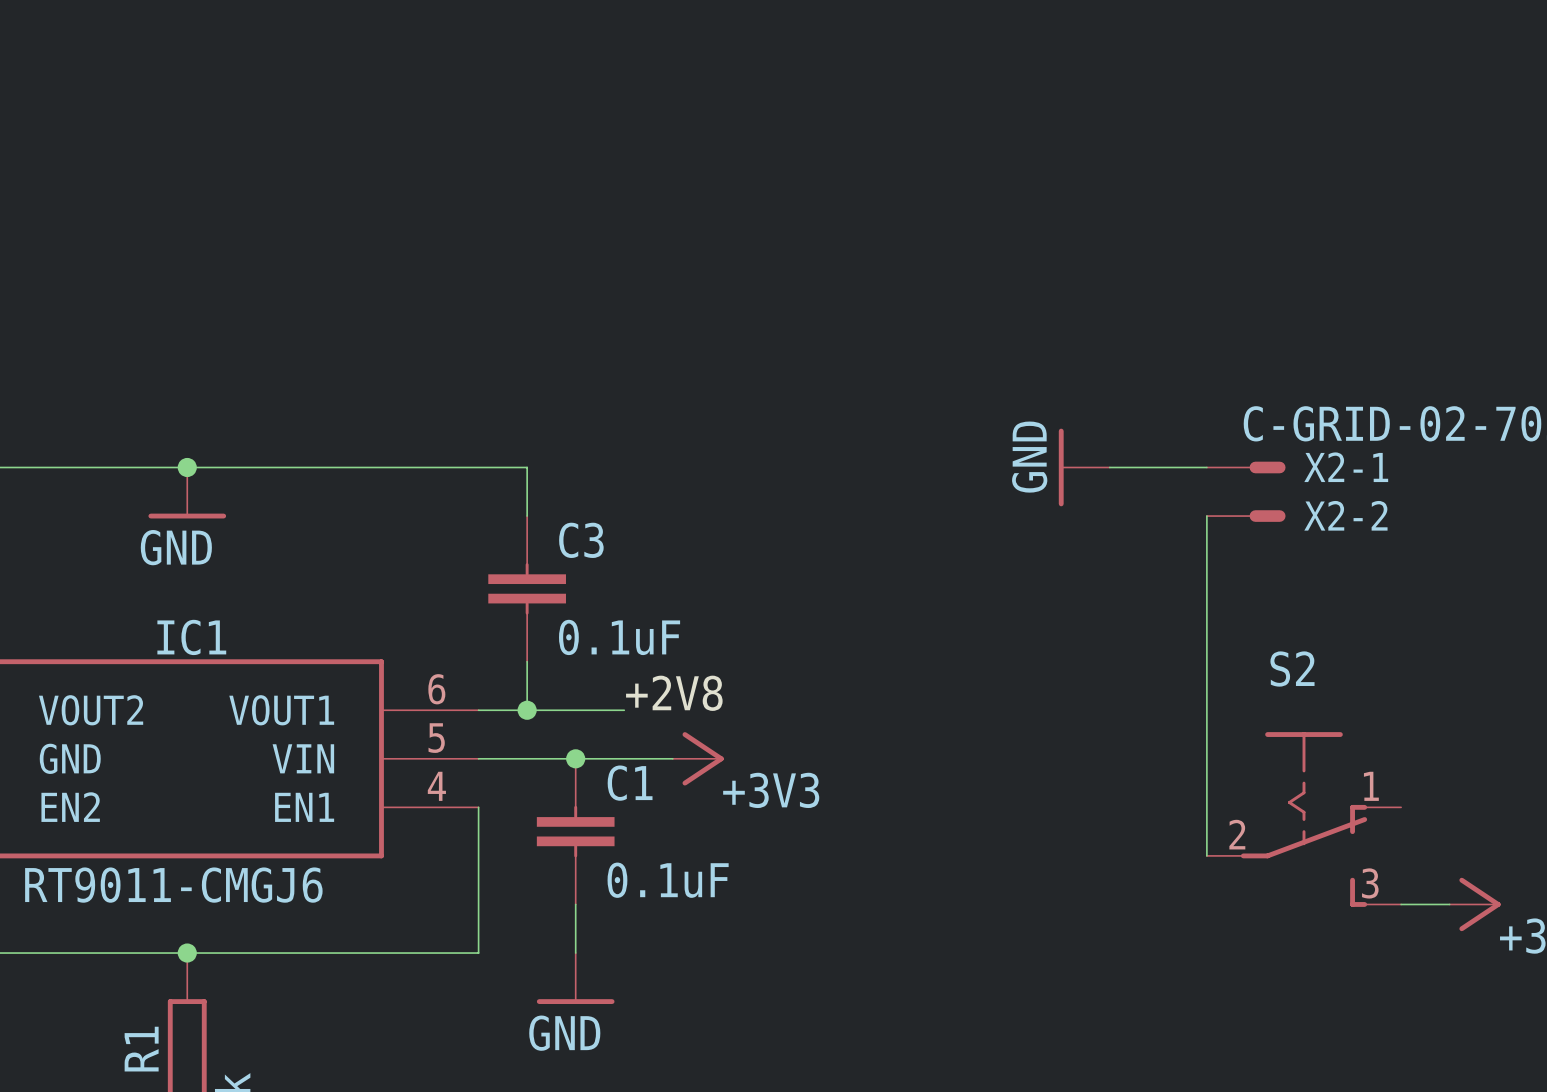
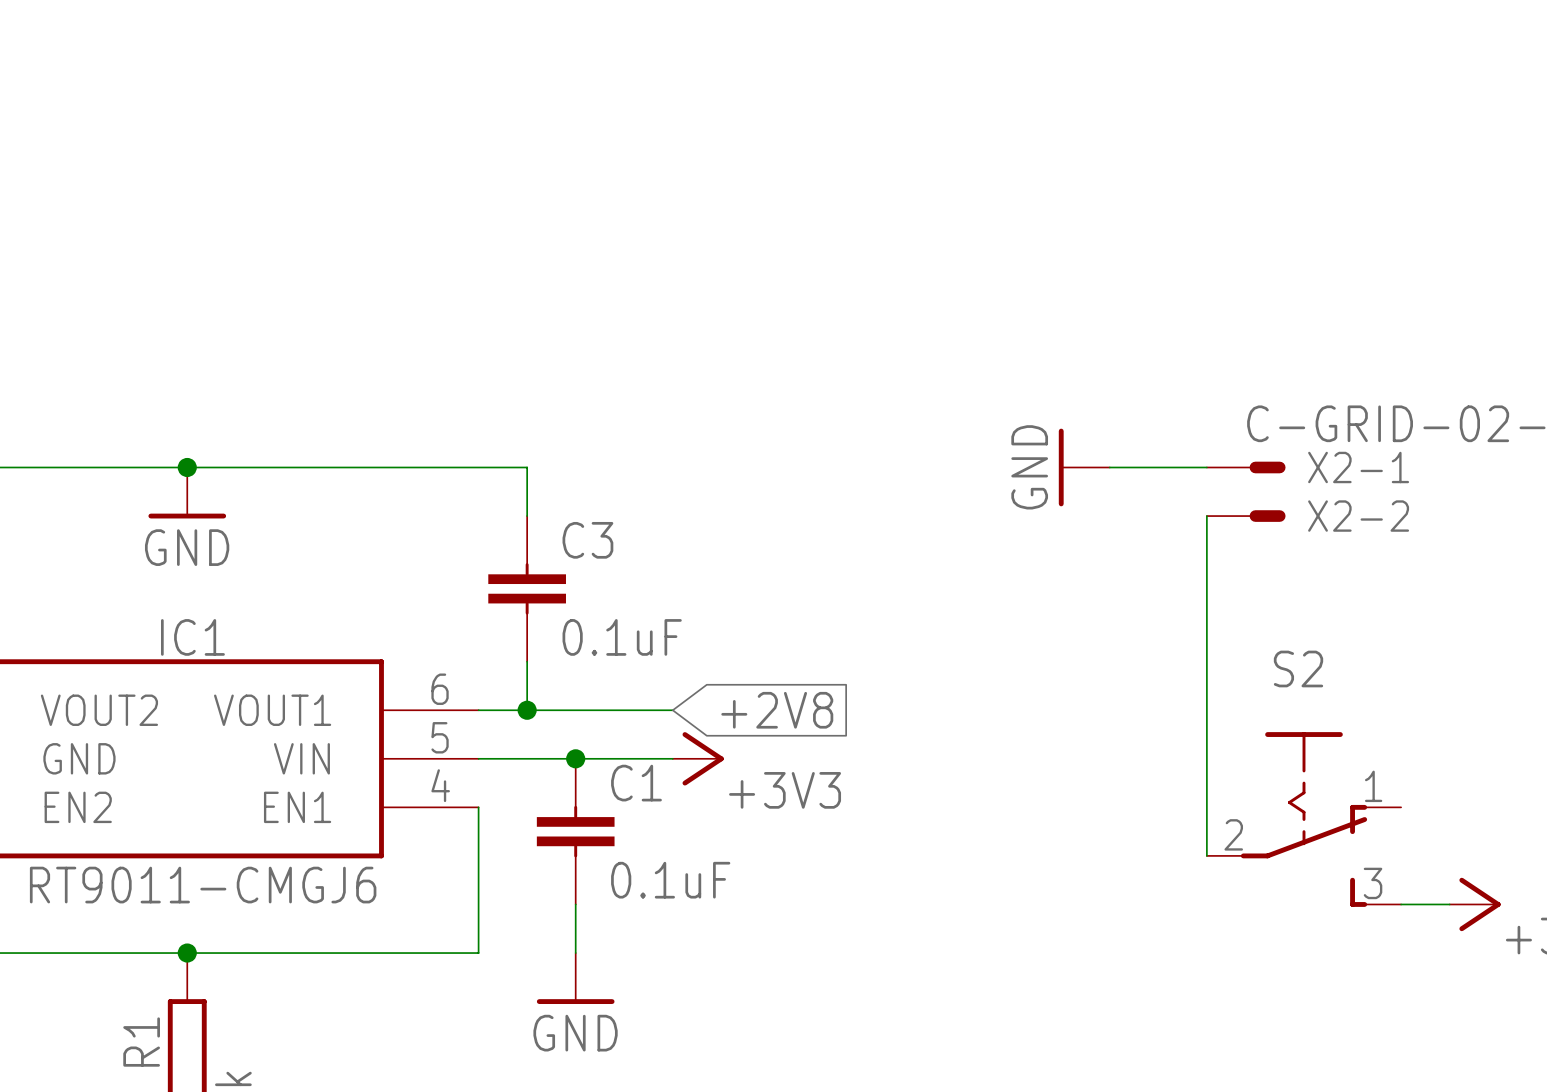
label: +2V8 (674, 693) -> none
wire: none -> (624, 710) (672, 710)
global label: none -> +2V8 (777, 710)

